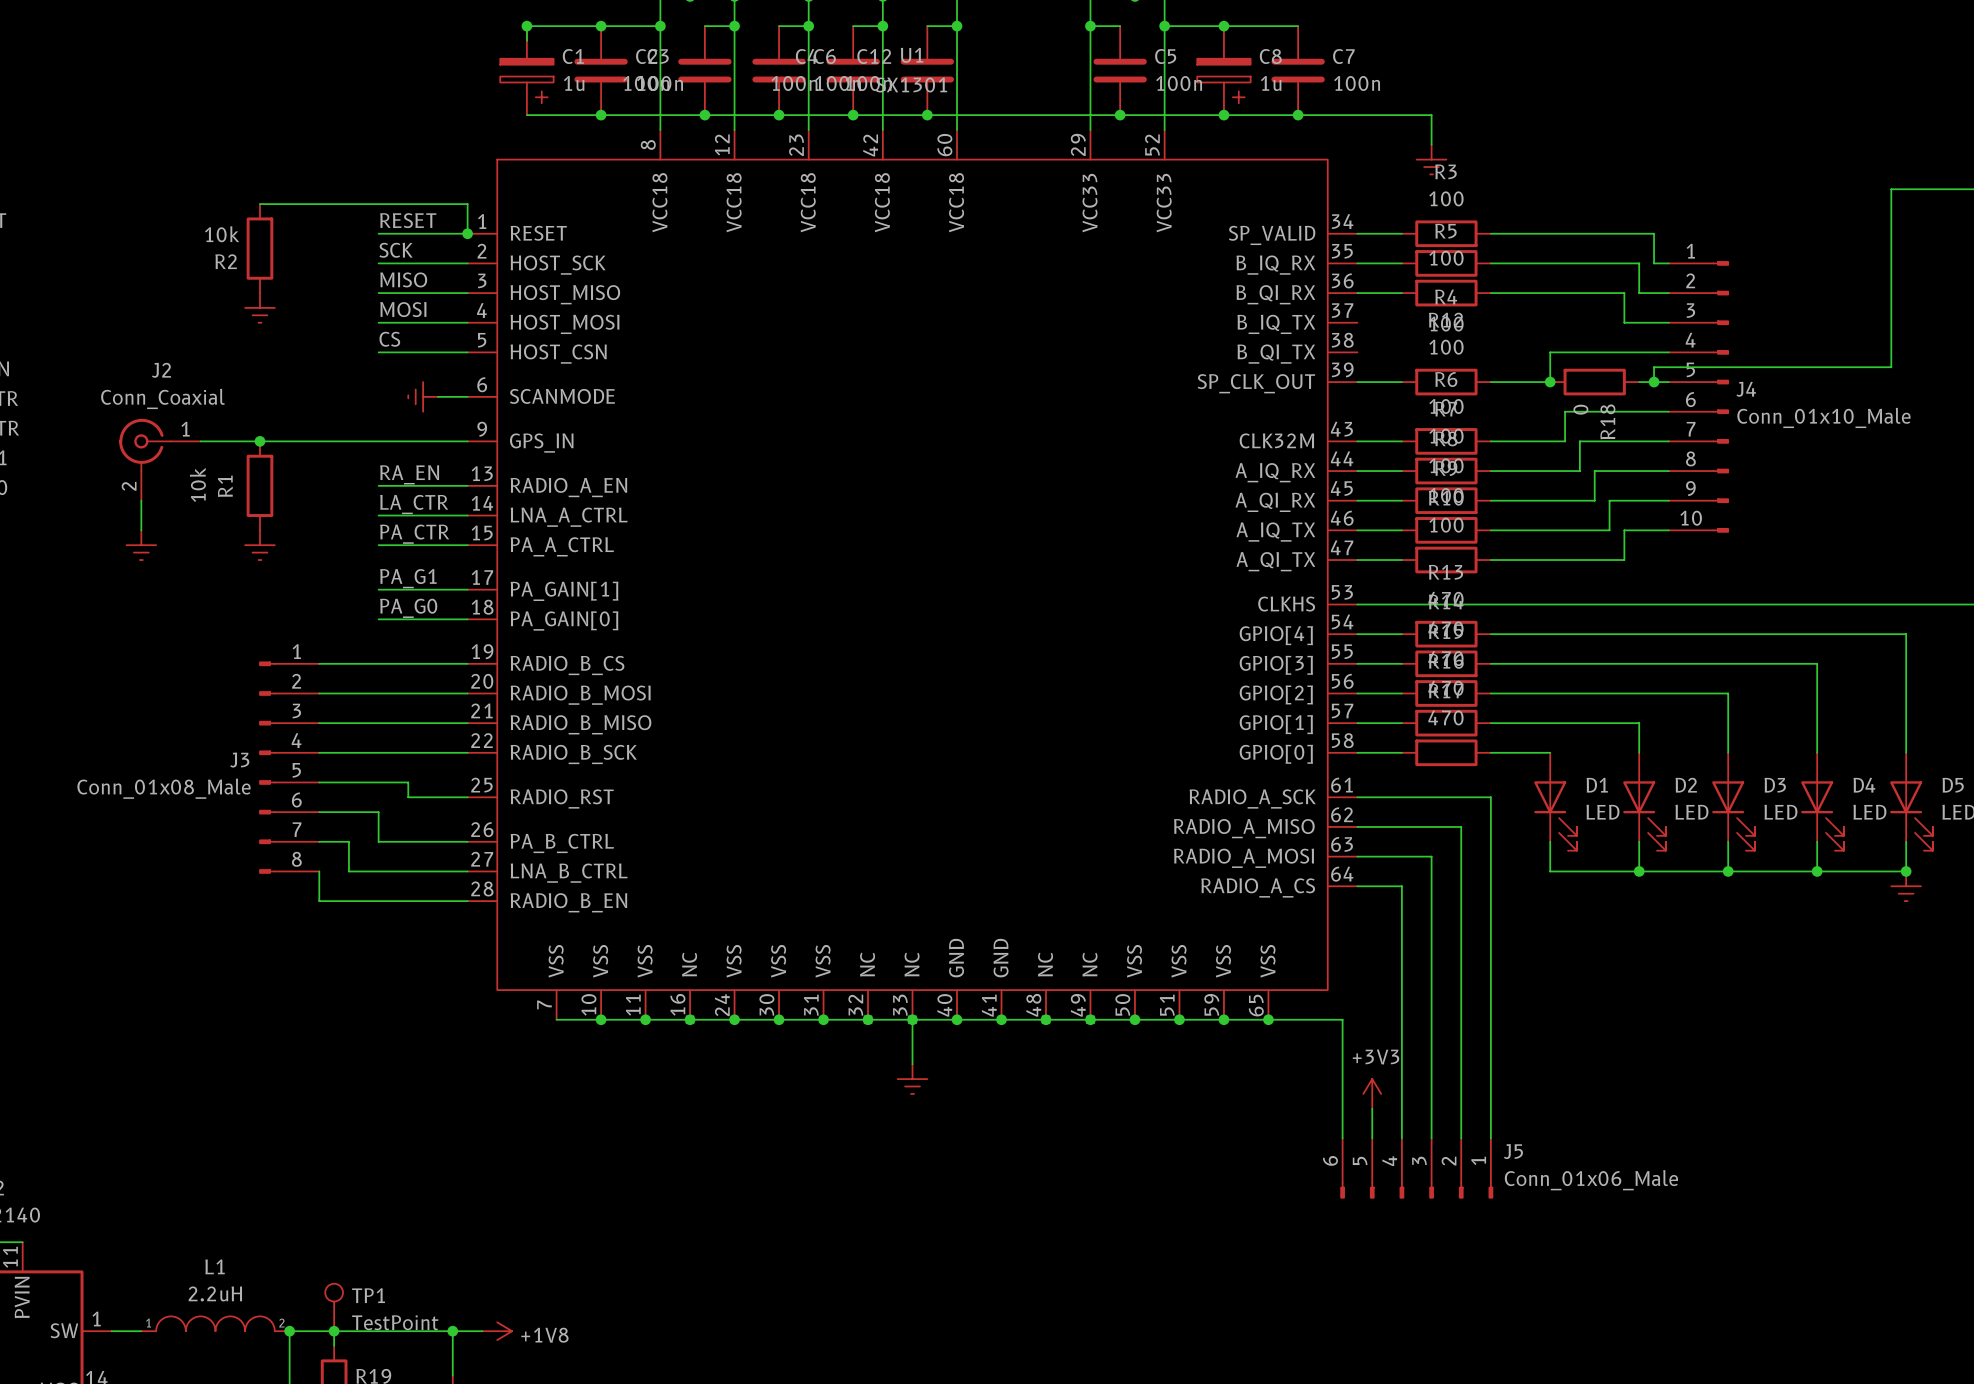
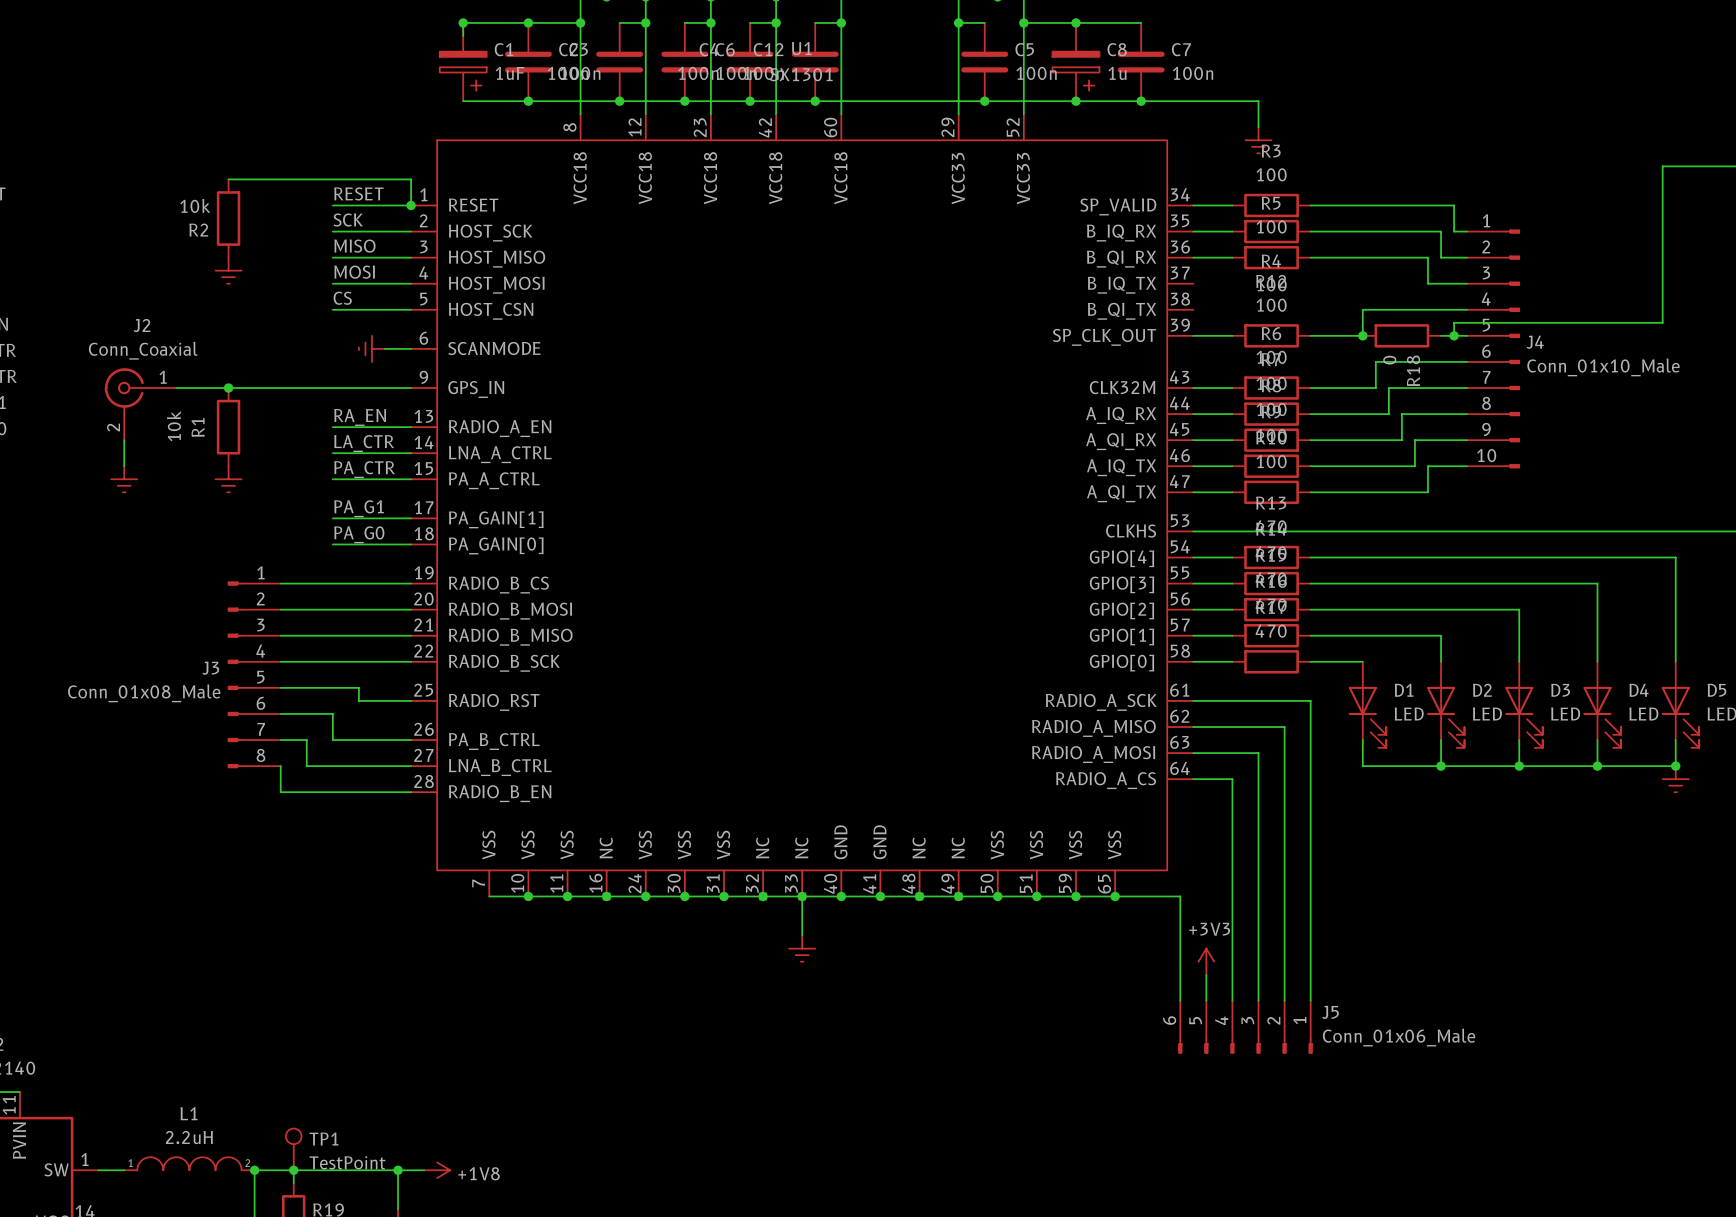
C1 value: 1u (574, 83) -> 1uF (510, 73)

